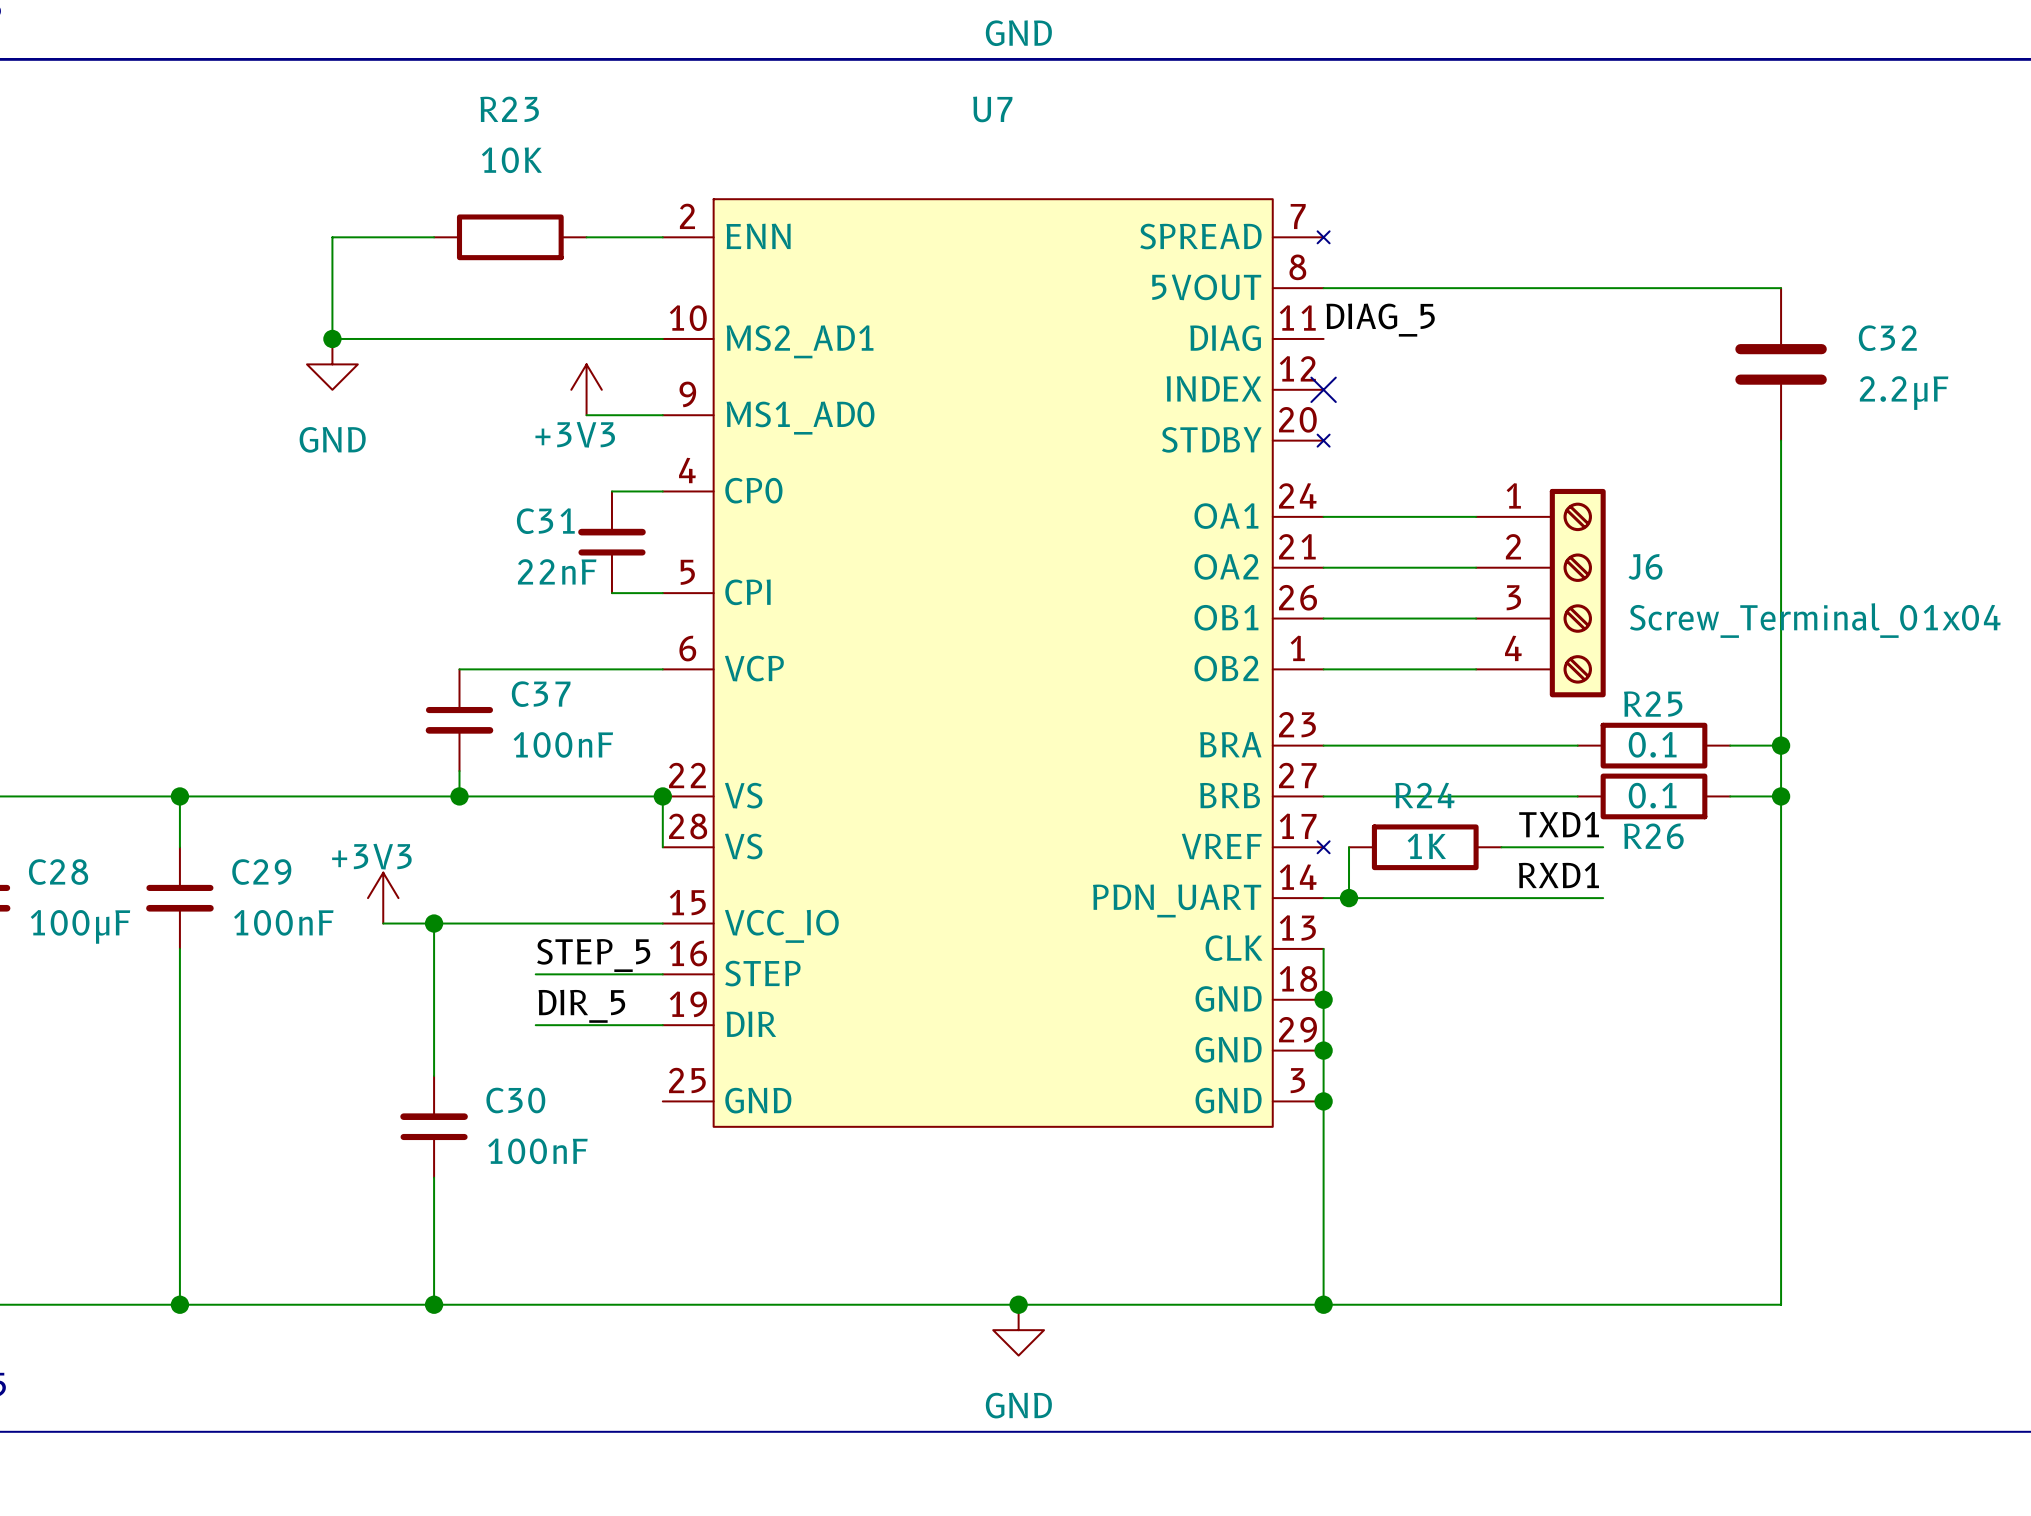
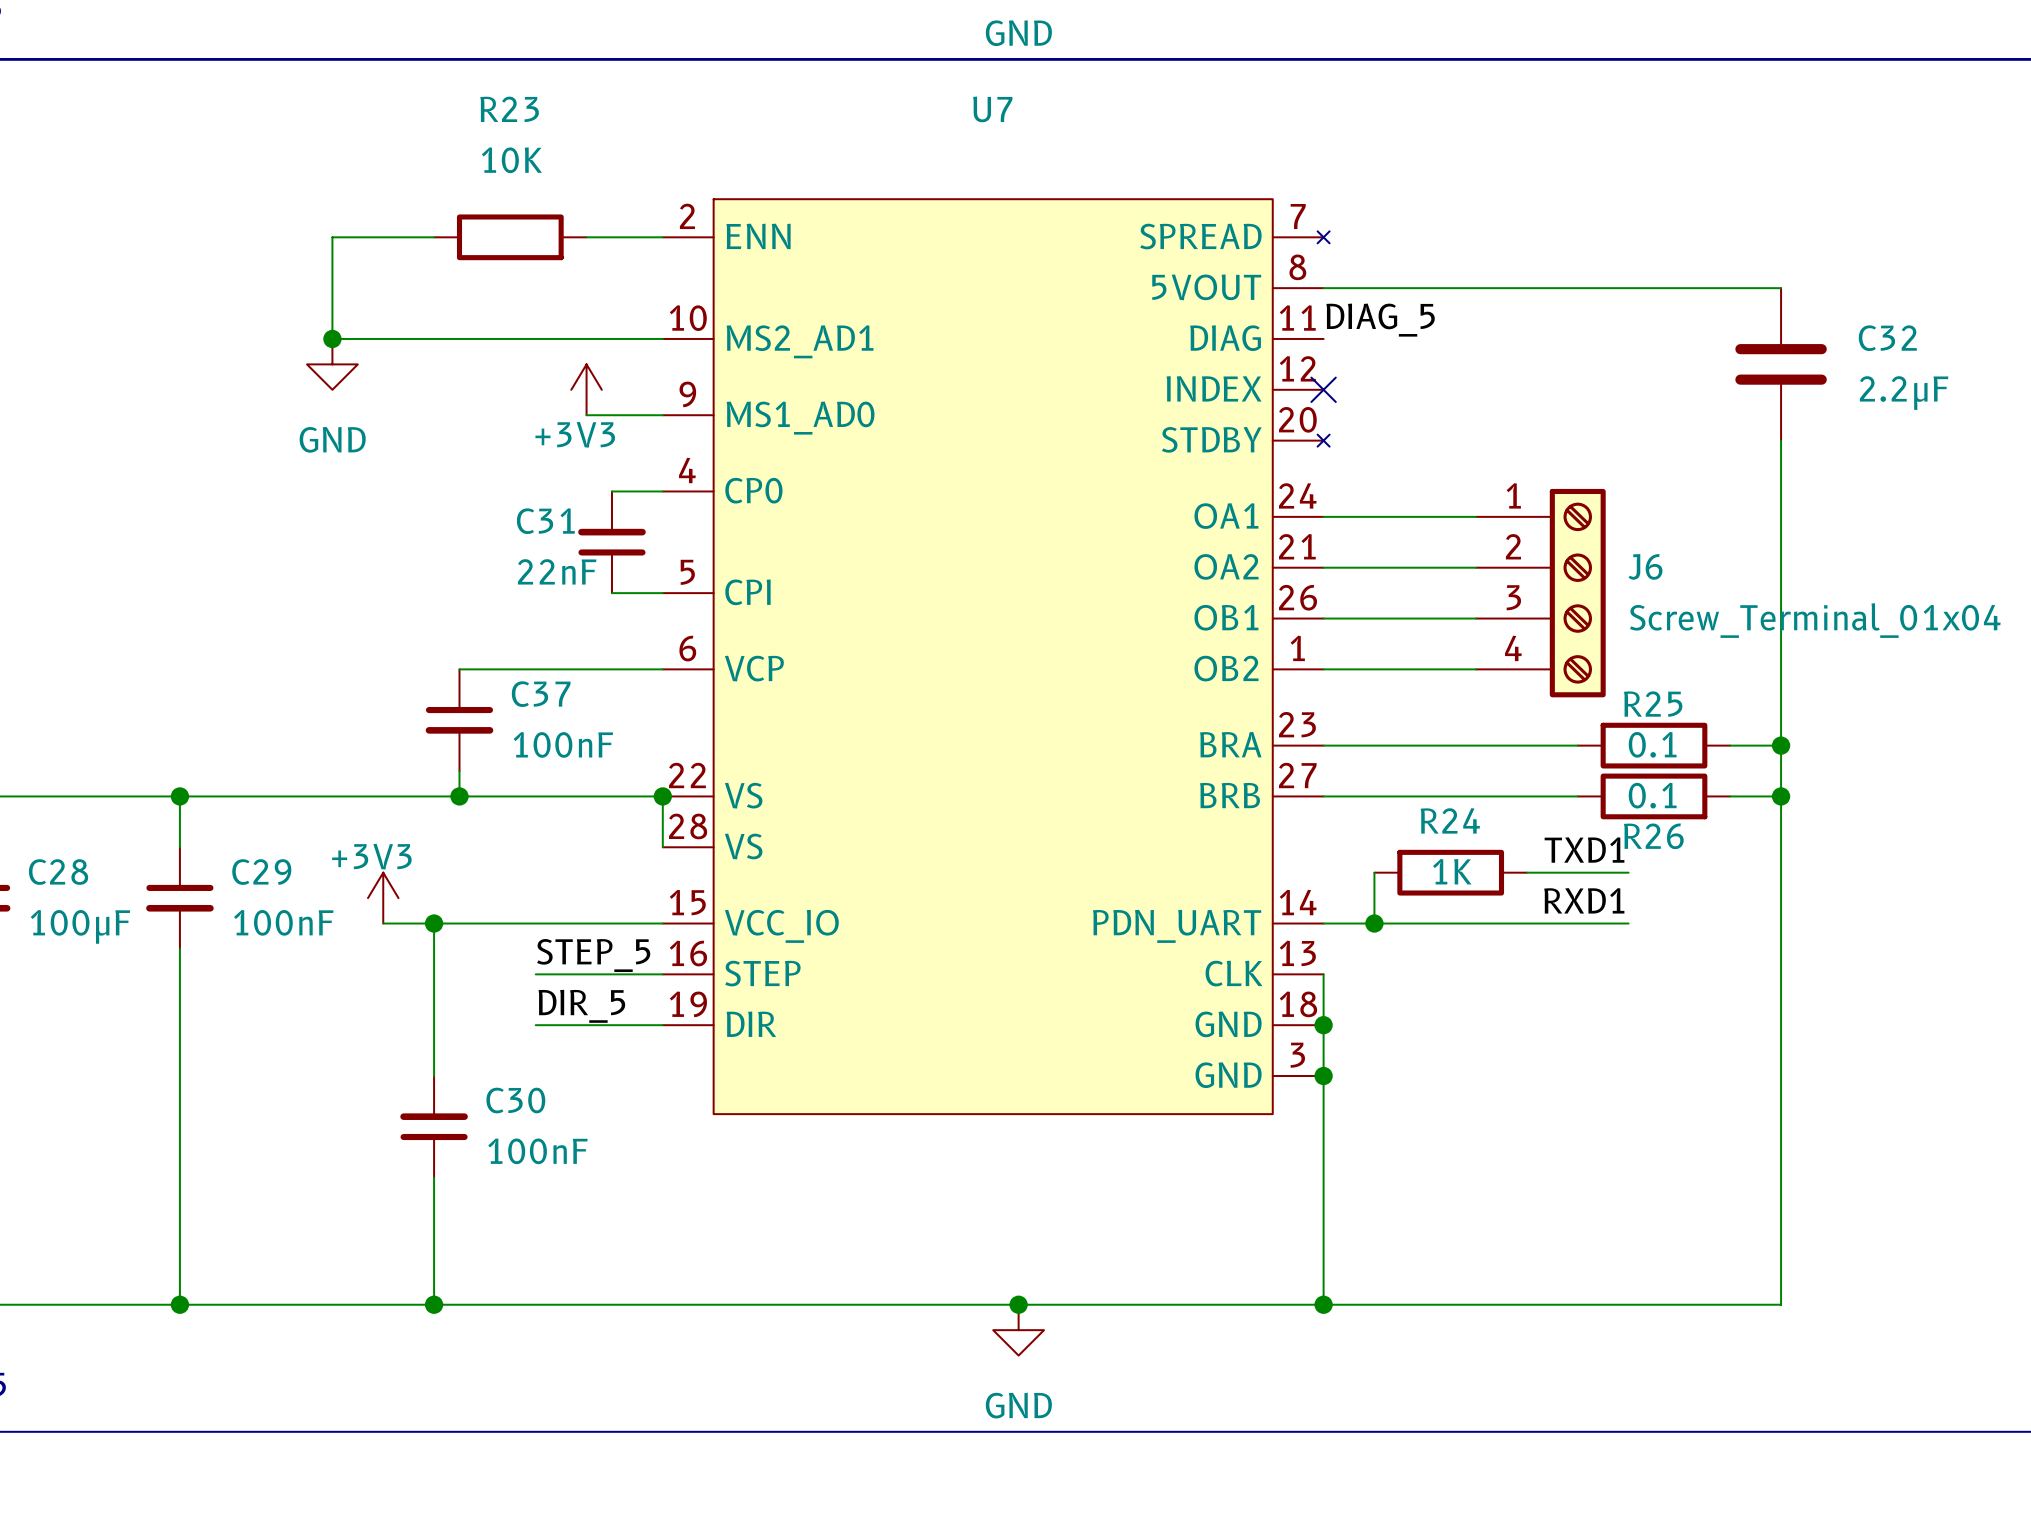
U7 symbol: [662, 199, 1330, 1127] -> [662, 199, 1330, 1115]
label position: TXD1 (1559, 824) -> TXD1 (1584, 850)
wire: (1349, 847) (1349, 898) -> (1374, 872) (1374, 923)
R24 position: (1425, 847) -> (1450, 872)
wire: (1501, 847) (1603, 847) -> (1526, 872) (1628, 872)
label position: RXD1 (1558, 875) -> RXD1 (1584, 900)
wire: (1323, 898) (1603, 898) -> none
junction position: (1349, 898) -> (1374, 923)
wire: none -> (1323, 923) (1628, 923)
wire: (1323, 948) (1323, 974) -> none
junction: (1323, 999) -> none
junction: none -> (1323, 1025)
junction: (1323, 1050) -> none
junction: none -> (1323, 1076)
junction: (1323, 1101) -> none

